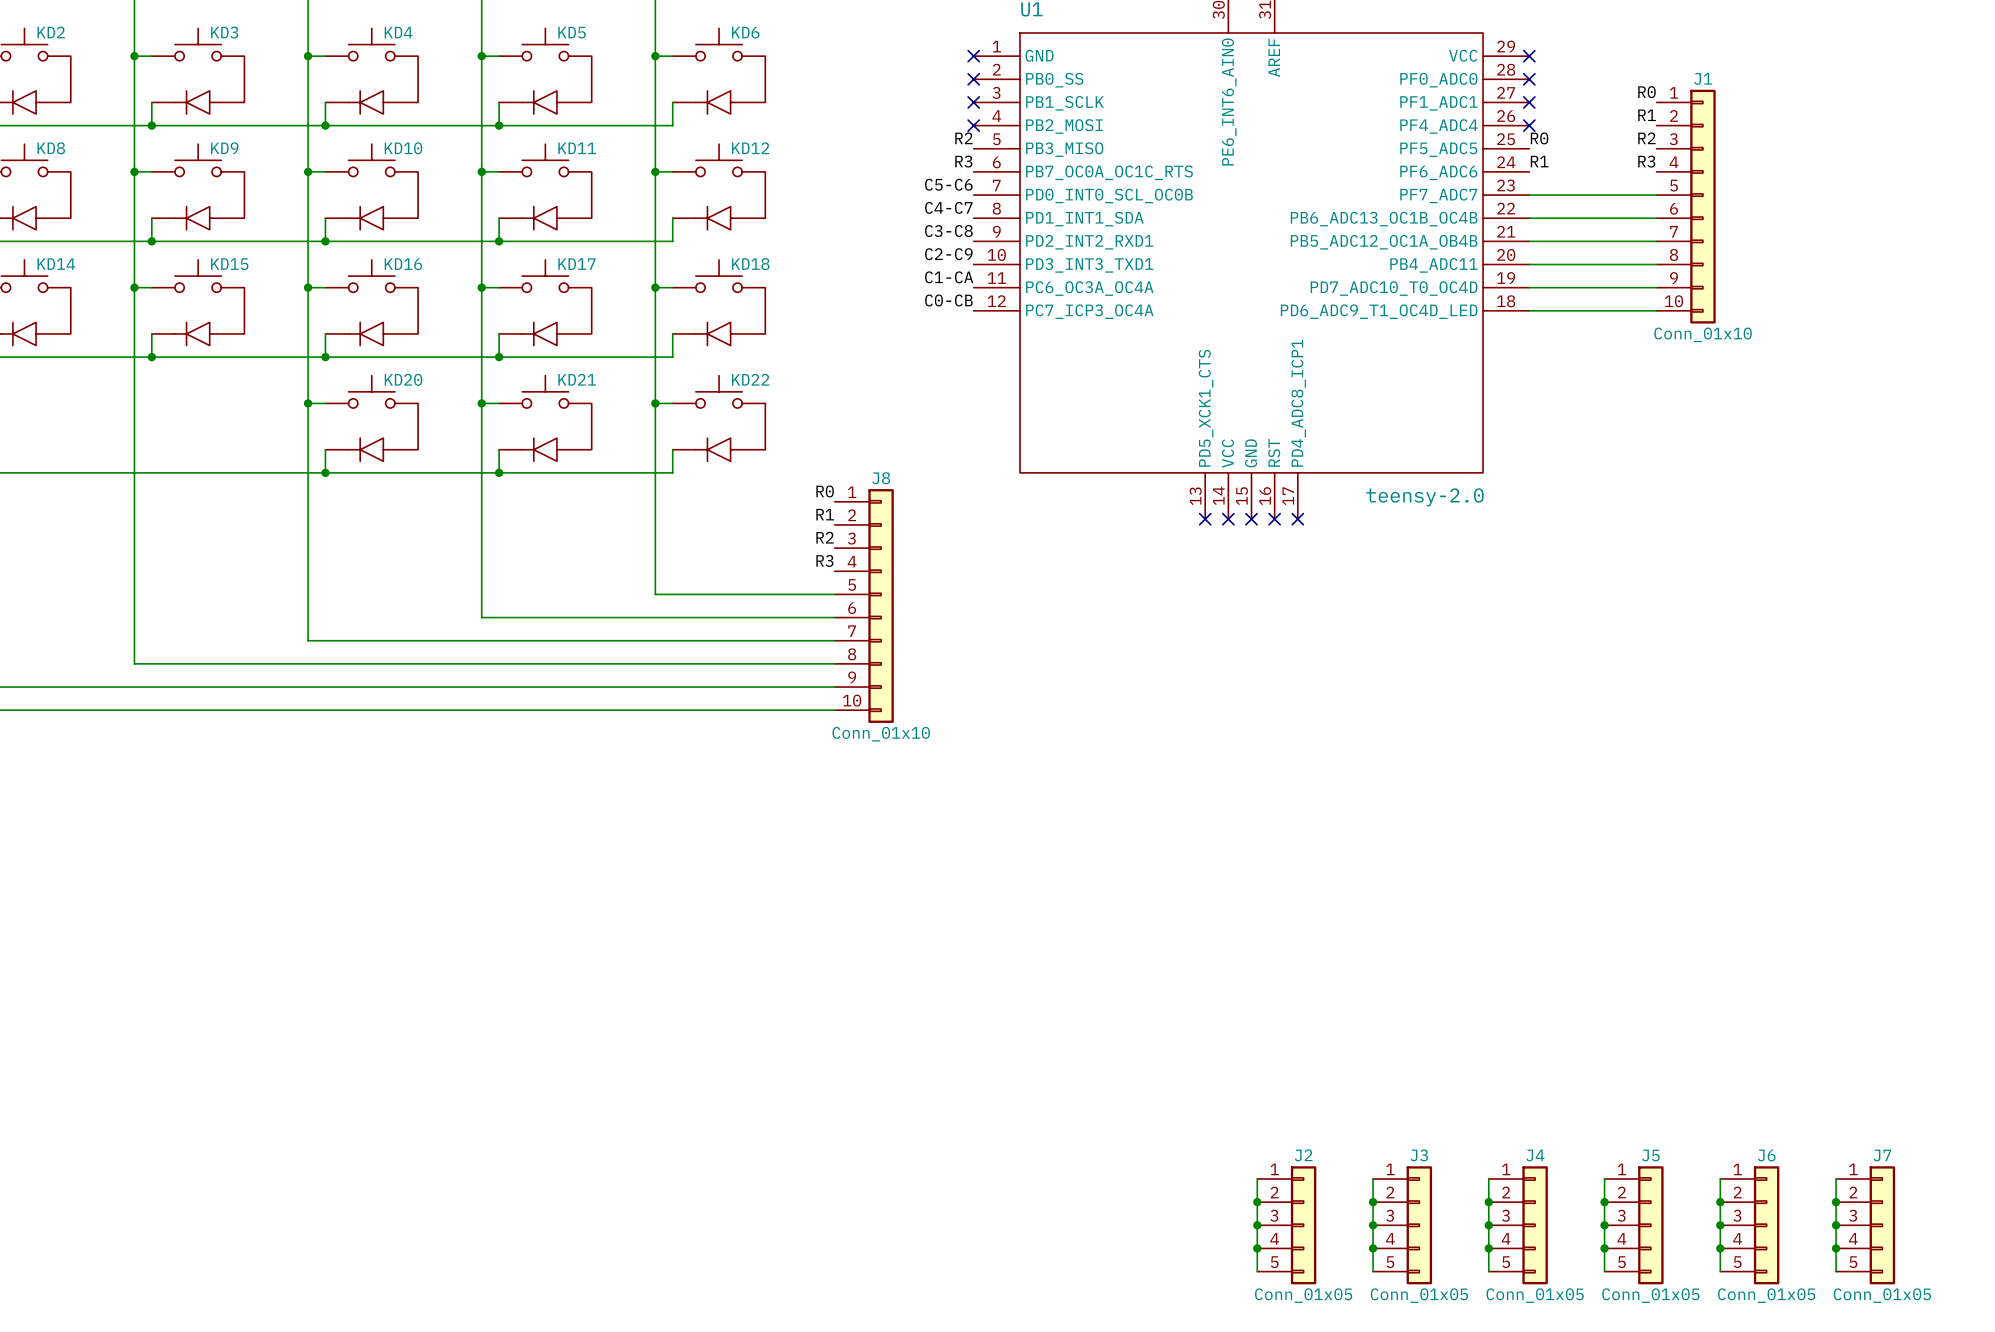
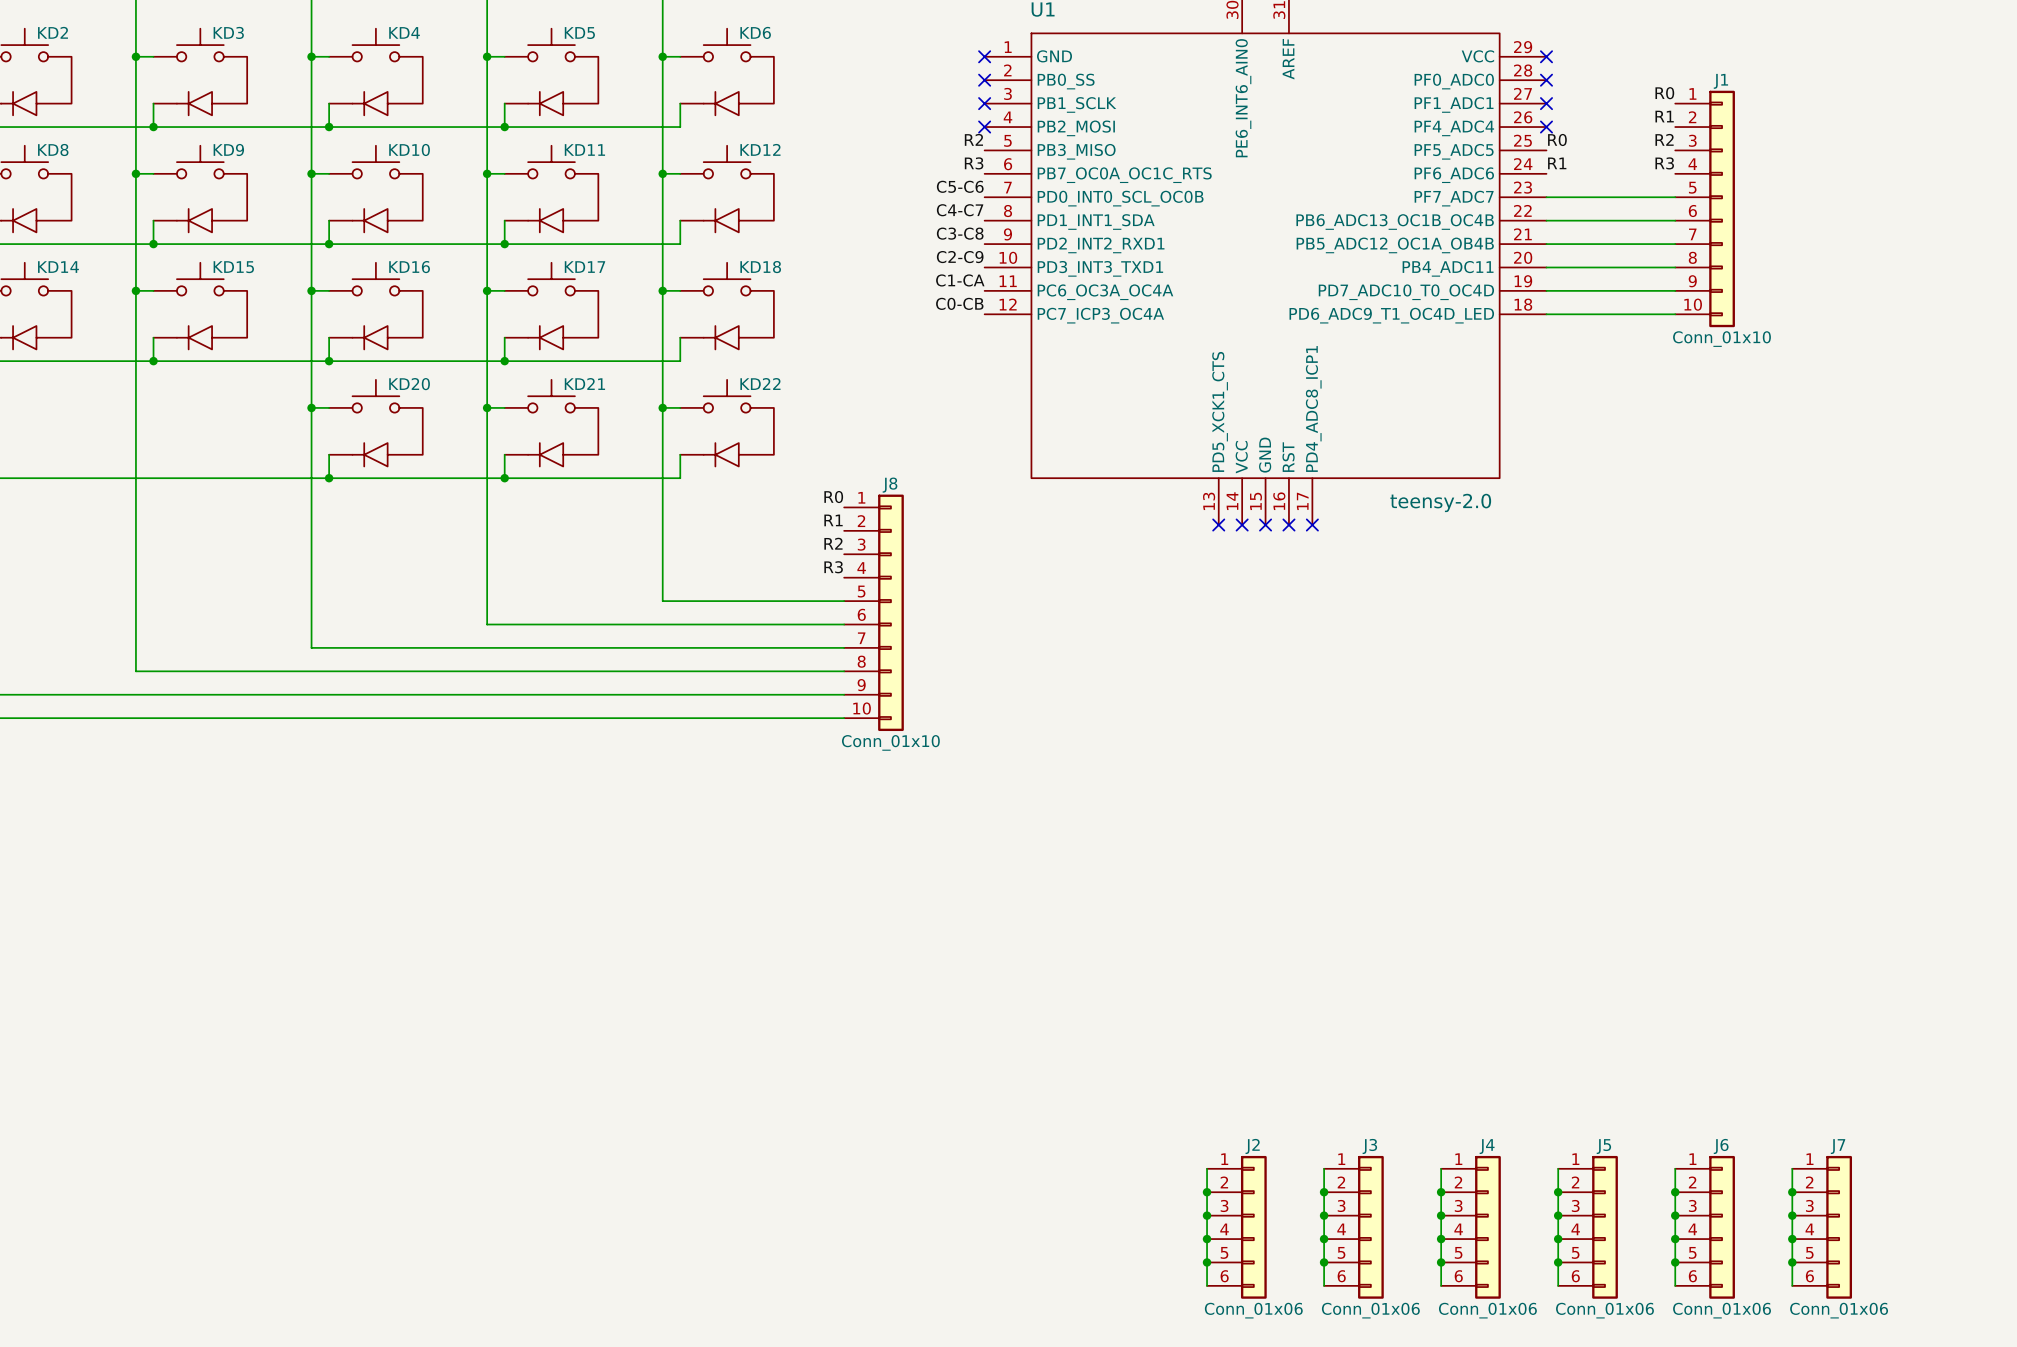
wire: none -> (1207, 1168) (1207, 1285)
J2 symbol: [1257, 1166, 1317, 1285] -> [1207, 1155, 1267, 1299]
J3 symbol: [1373, 1166, 1433, 1285] -> [1324, 1155, 1384, 1299]
J4 symbol: [1488, 1166, 1548, 1285] -> [1441, 1155, 1501, 1299]
J5 symbol: [1604, 1166, 1664, 1285] -> [1558, 1155, 1618, 1299]
J6 symbol: [1720, 1166, 1780, 1285] -> [1675, 1155, 1735, 1299]
J7 symbol: [1836, 1166, 1896, 1285] -> [1792, 1155, 1853, 1299]
junction: none -> (1207, 1192)
wire: (1257, 1178) (1257, 1271) -> none
junction: none -> (1324, 1192)
wire: (1373, 1178) (1373, 1271) -> none
junction: none -> (1441, 1192)
wire: (1488, 1178) (1488, 1271) -> none
junction: none -> (1558, 1192)
wire: (1604, 1178) (1604, 1271) -> none
junction: none -> (1675, 1192)
wire: (1720, 1178) (1720, 1271) -> none
junction: none -> (1792, 1192)
wire: (1836, 1178) (1836, 1271) -> none
junction: none -> (1207, 1215)
junction: (1257, 1202) -> none
junction: none -> (1324, 1215)
junction: (1373, 1202) -> none
junction: none -> (1441, 1215)
junction: (1488, 1202) -> none
junction: none -> (1558, 1215)
junction: (1604, 1202) -> none
junction: none -> (1675, 1215)
junction: (1720, 1202) -> none
junction: none -> (1792, 1215)
junction: (1836, 1202) -> none
junction: none -> (1207, 1239)
junction: (1257, 1225) -> none
junction: none -> (1324, 1239)
junction: (1373, 1225) -> none
junction: none -> (1441, 1239)
junction: (1488, 1225) -> none
junction: none -> (1558, 1239)
junction: (1604, 1225) -> none
junction: none -> (1675, 1239)
junction: (1720, 1225) -> none
junction: none -> (1792, 1239)
junction: (1836, 1225) -> none
junction: none -> (1207, 1262)
junction: (1257, 1248) -> none
junction: none -> (1324, 1262)
junction: (1373, 1248) -> none
junction: none -> (1441, 1262)
junction: (1488, 1248) -> none
junction: none -> (1558, 1262)
junction: (1604, 1248) -> none
junction: none -> (1675, 1262)
junction: (1720, 1248) -> none
junction: none -> (1792, 1262)
junction: (1836, 1248) -> none
J2 value: Conn_01x05 (1303, 1295) -> Conn_01x06 (1253, 1310)
J3 value: Conn_01x05 (1419, 1295) -> Conn_01x06 (1370, 1310)
J4 value: Conn_01x05 (1535, 1295) -> Conn_01x06 (1487, 1310)
J5 value: Conn_01x05 (1650, 1295) -> Conn_01x06 (1604, 1310)
J6 value: Conn_01x05 (1766, 1295) -> Conn_01x06 (1722, 1310)
J7 value: Conn_01x05 (1882, 1295) -> Conn_01x06 (1839, 1310)

